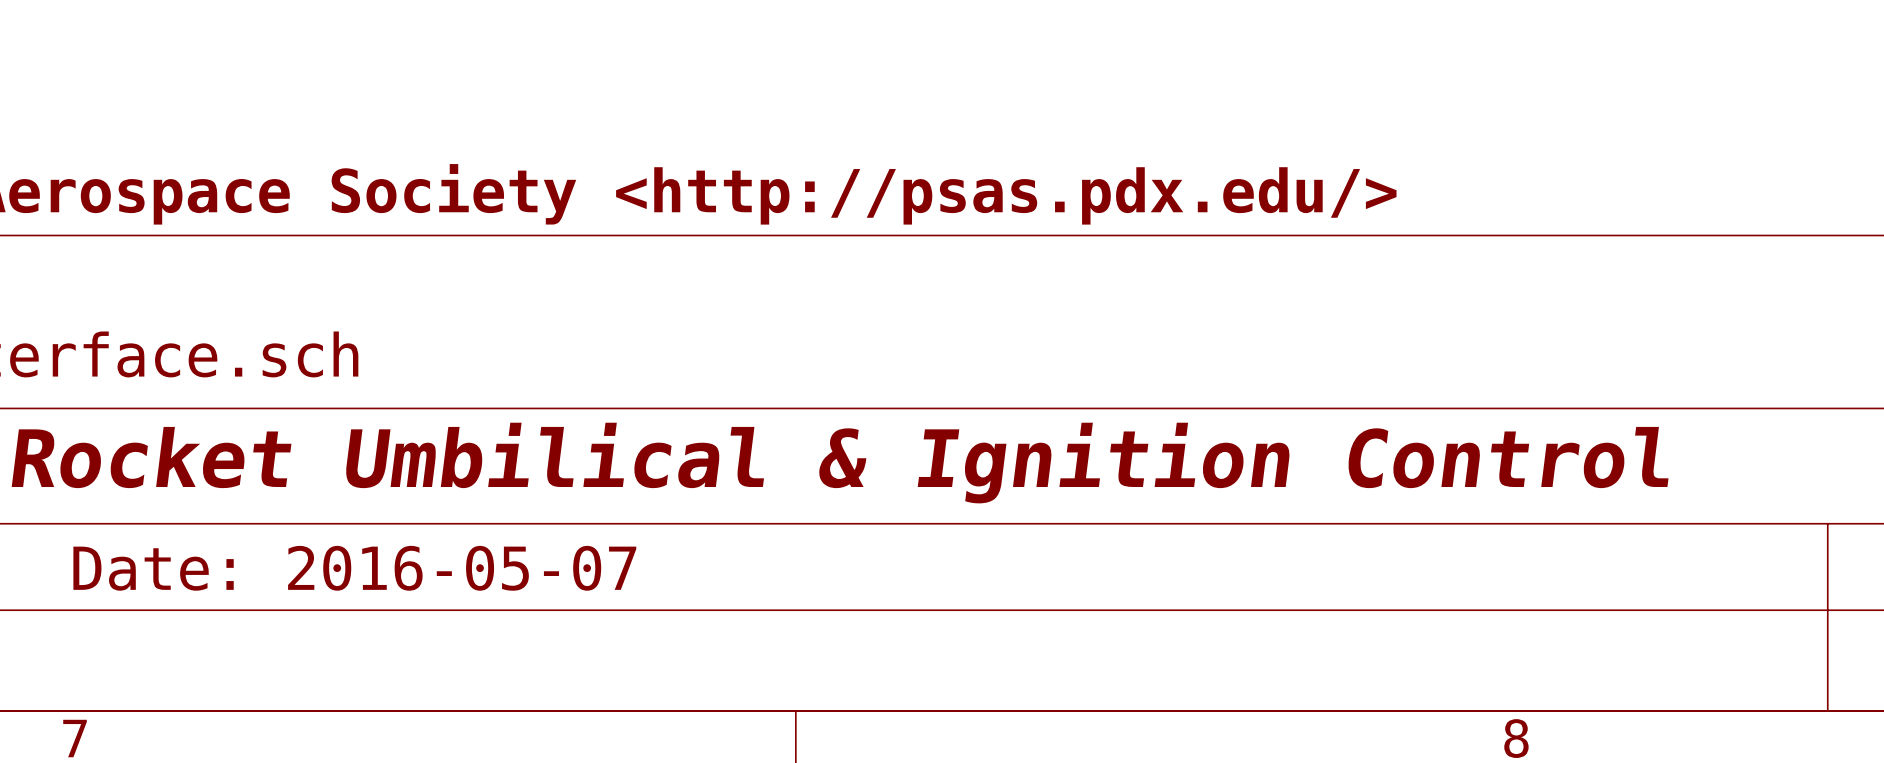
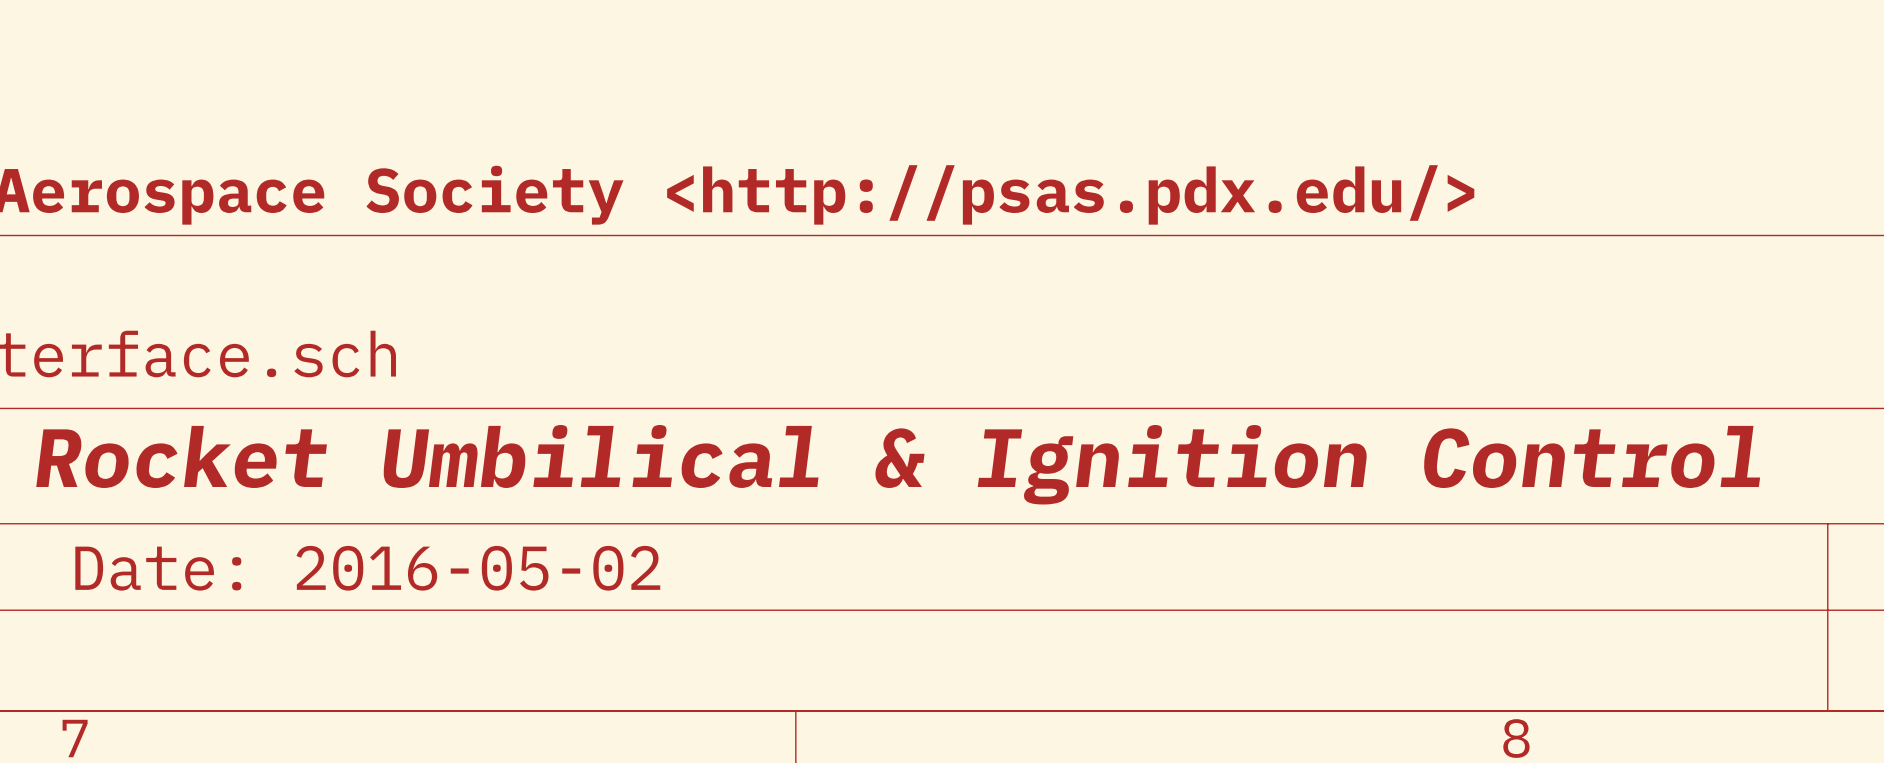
title block: Date: 2016-05-07 (354, 568) -> Date: 2016-05-02 (367, 568)

